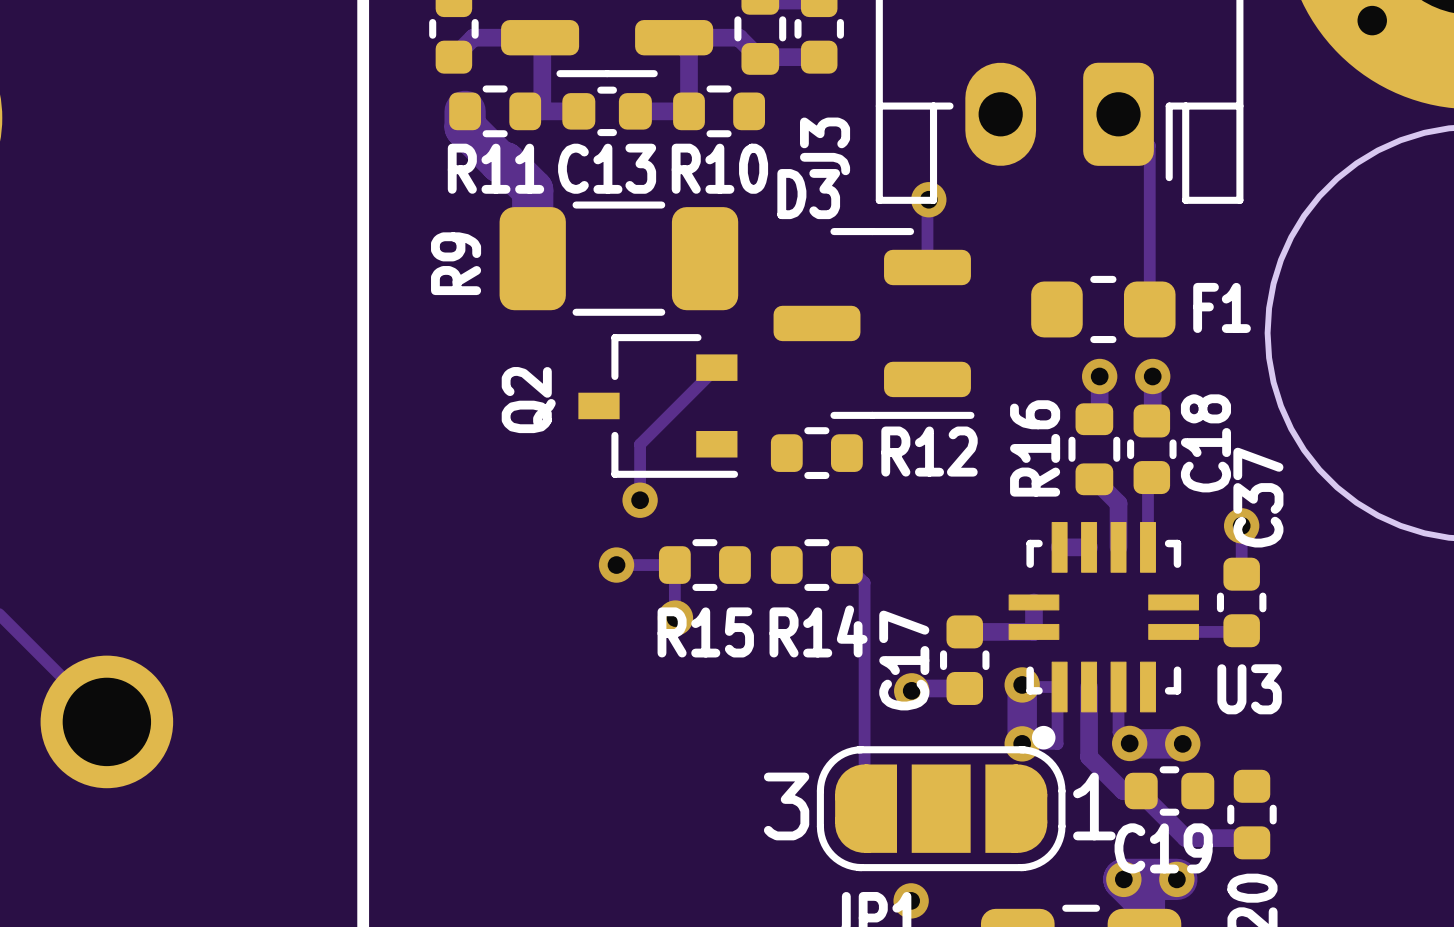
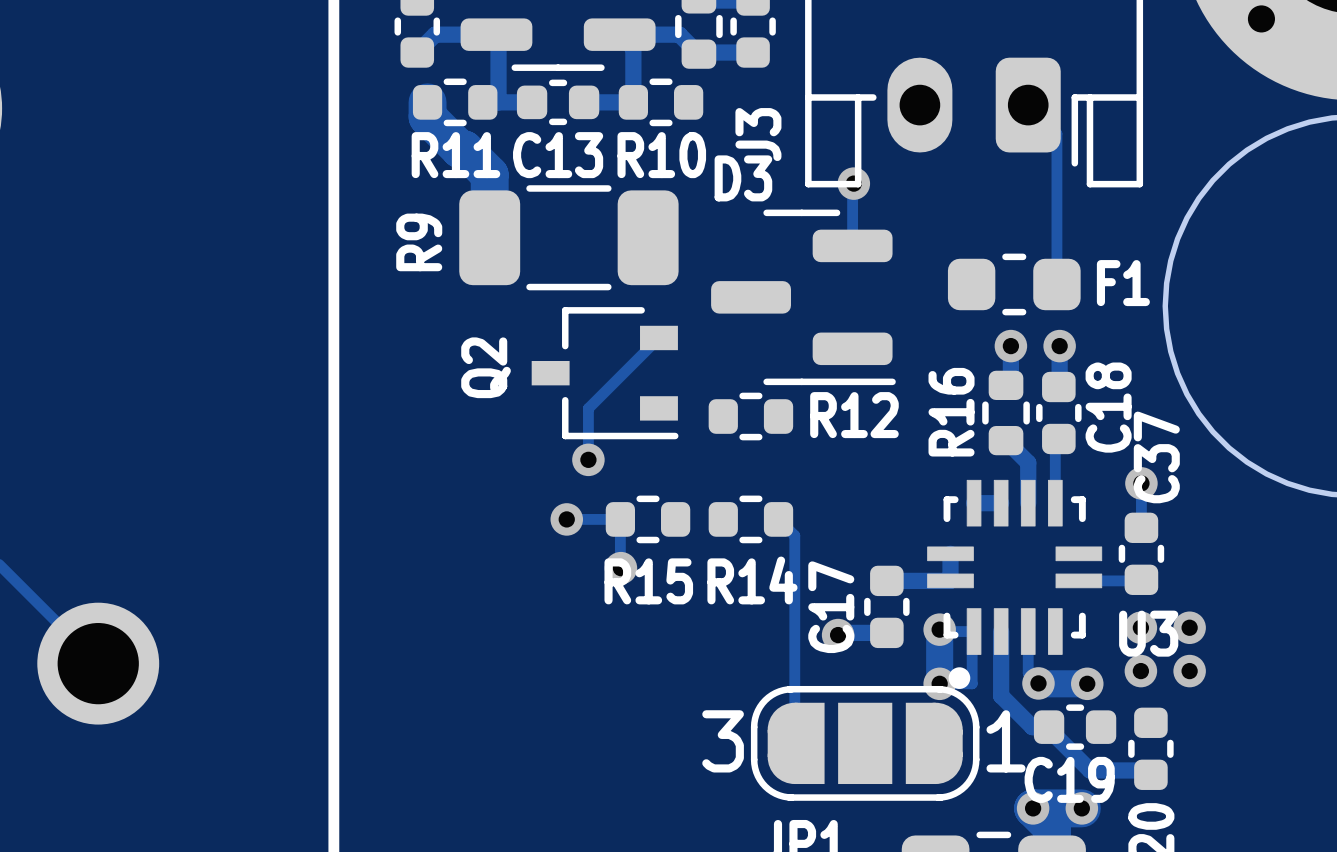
via: none -> (1140, 627)
via: none -> (1189, 627)
via: none -> (1140, 671)
via: none -> (1189, 671)
via: (911, 900) -> none

